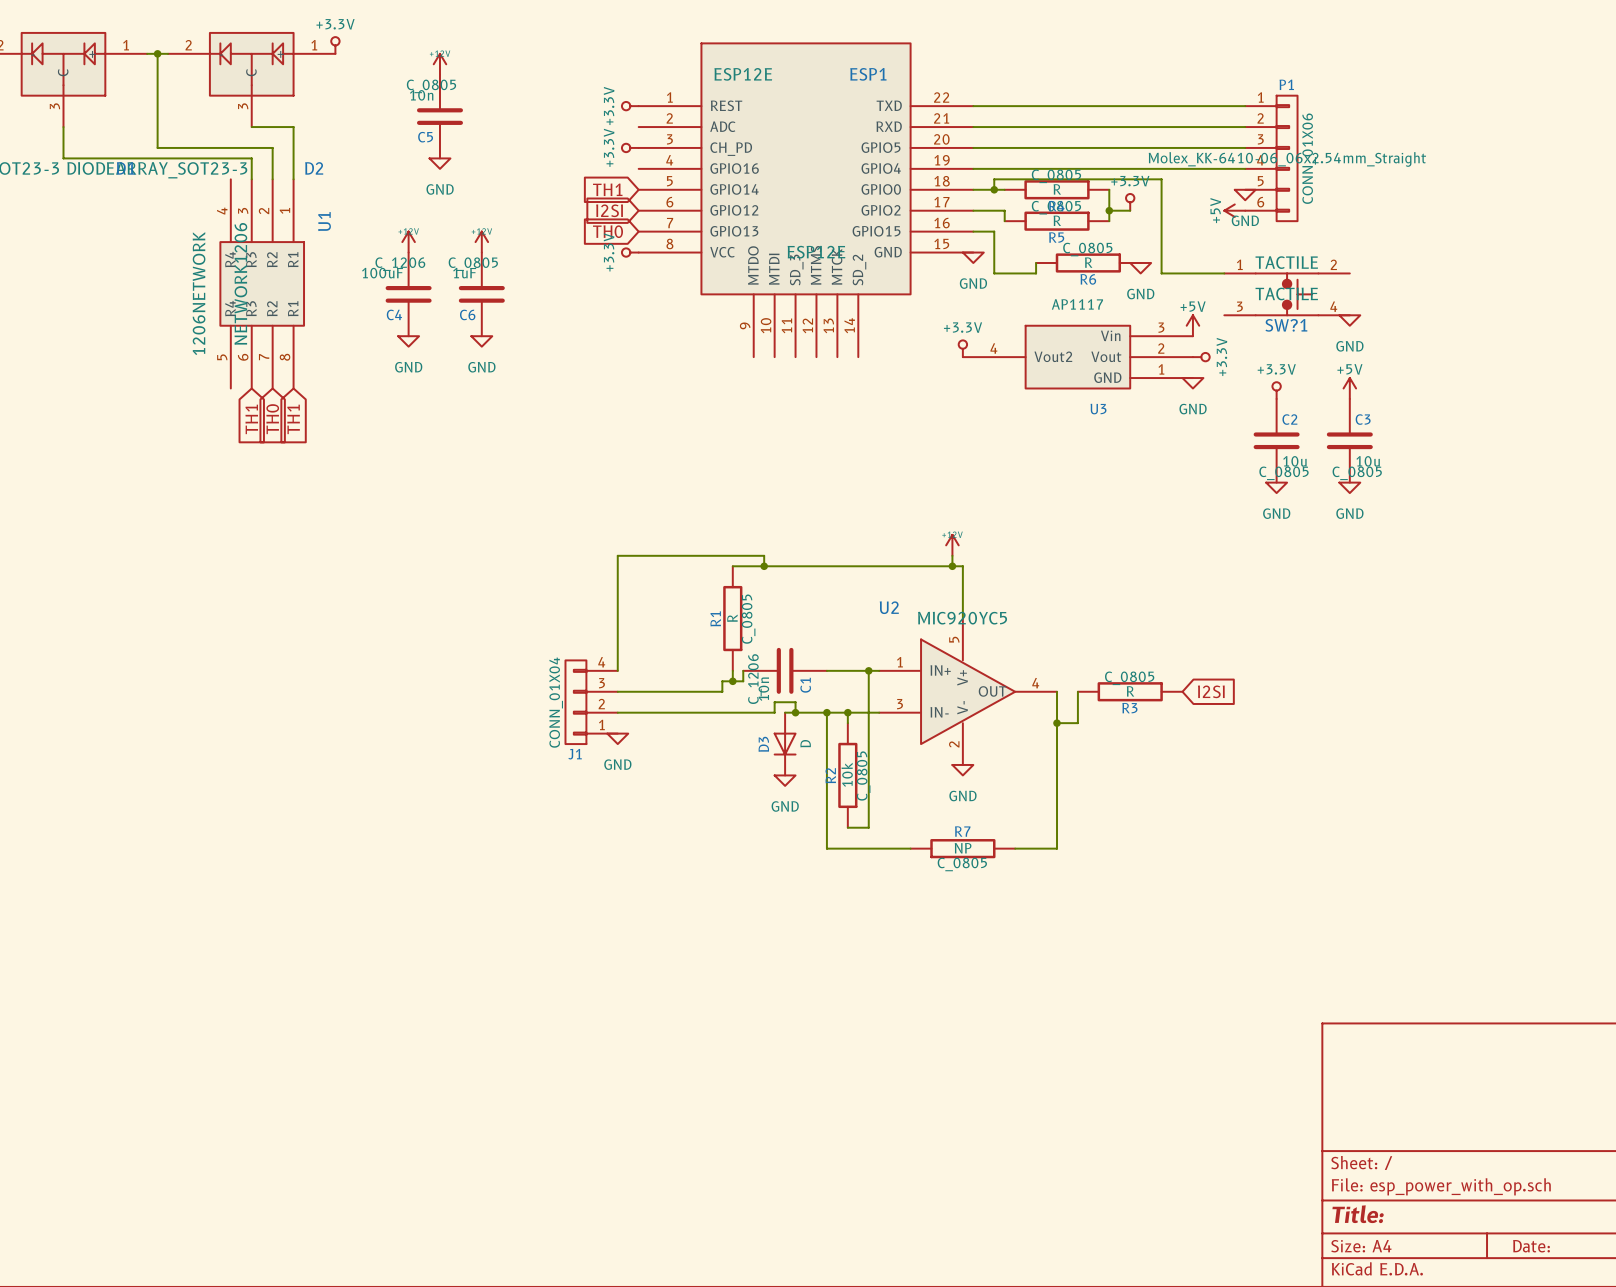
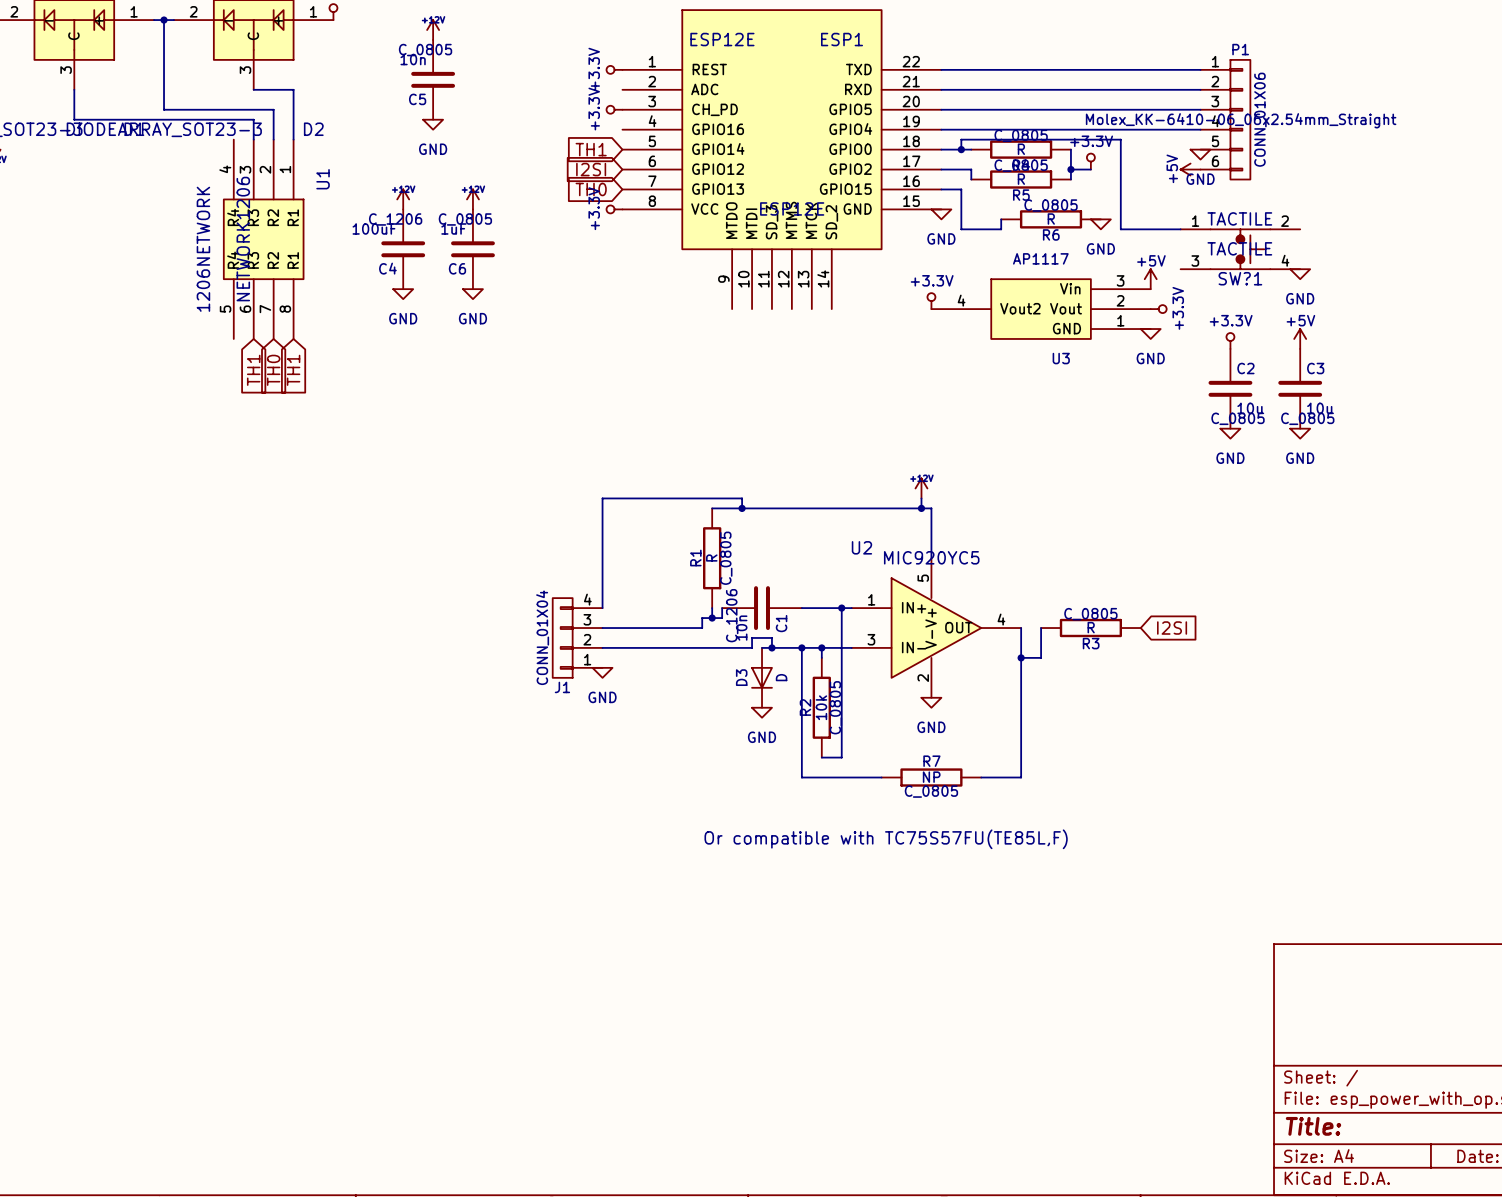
text: none -> Or compatible with TC75S57FU(TE85L,F) (886, 839)

